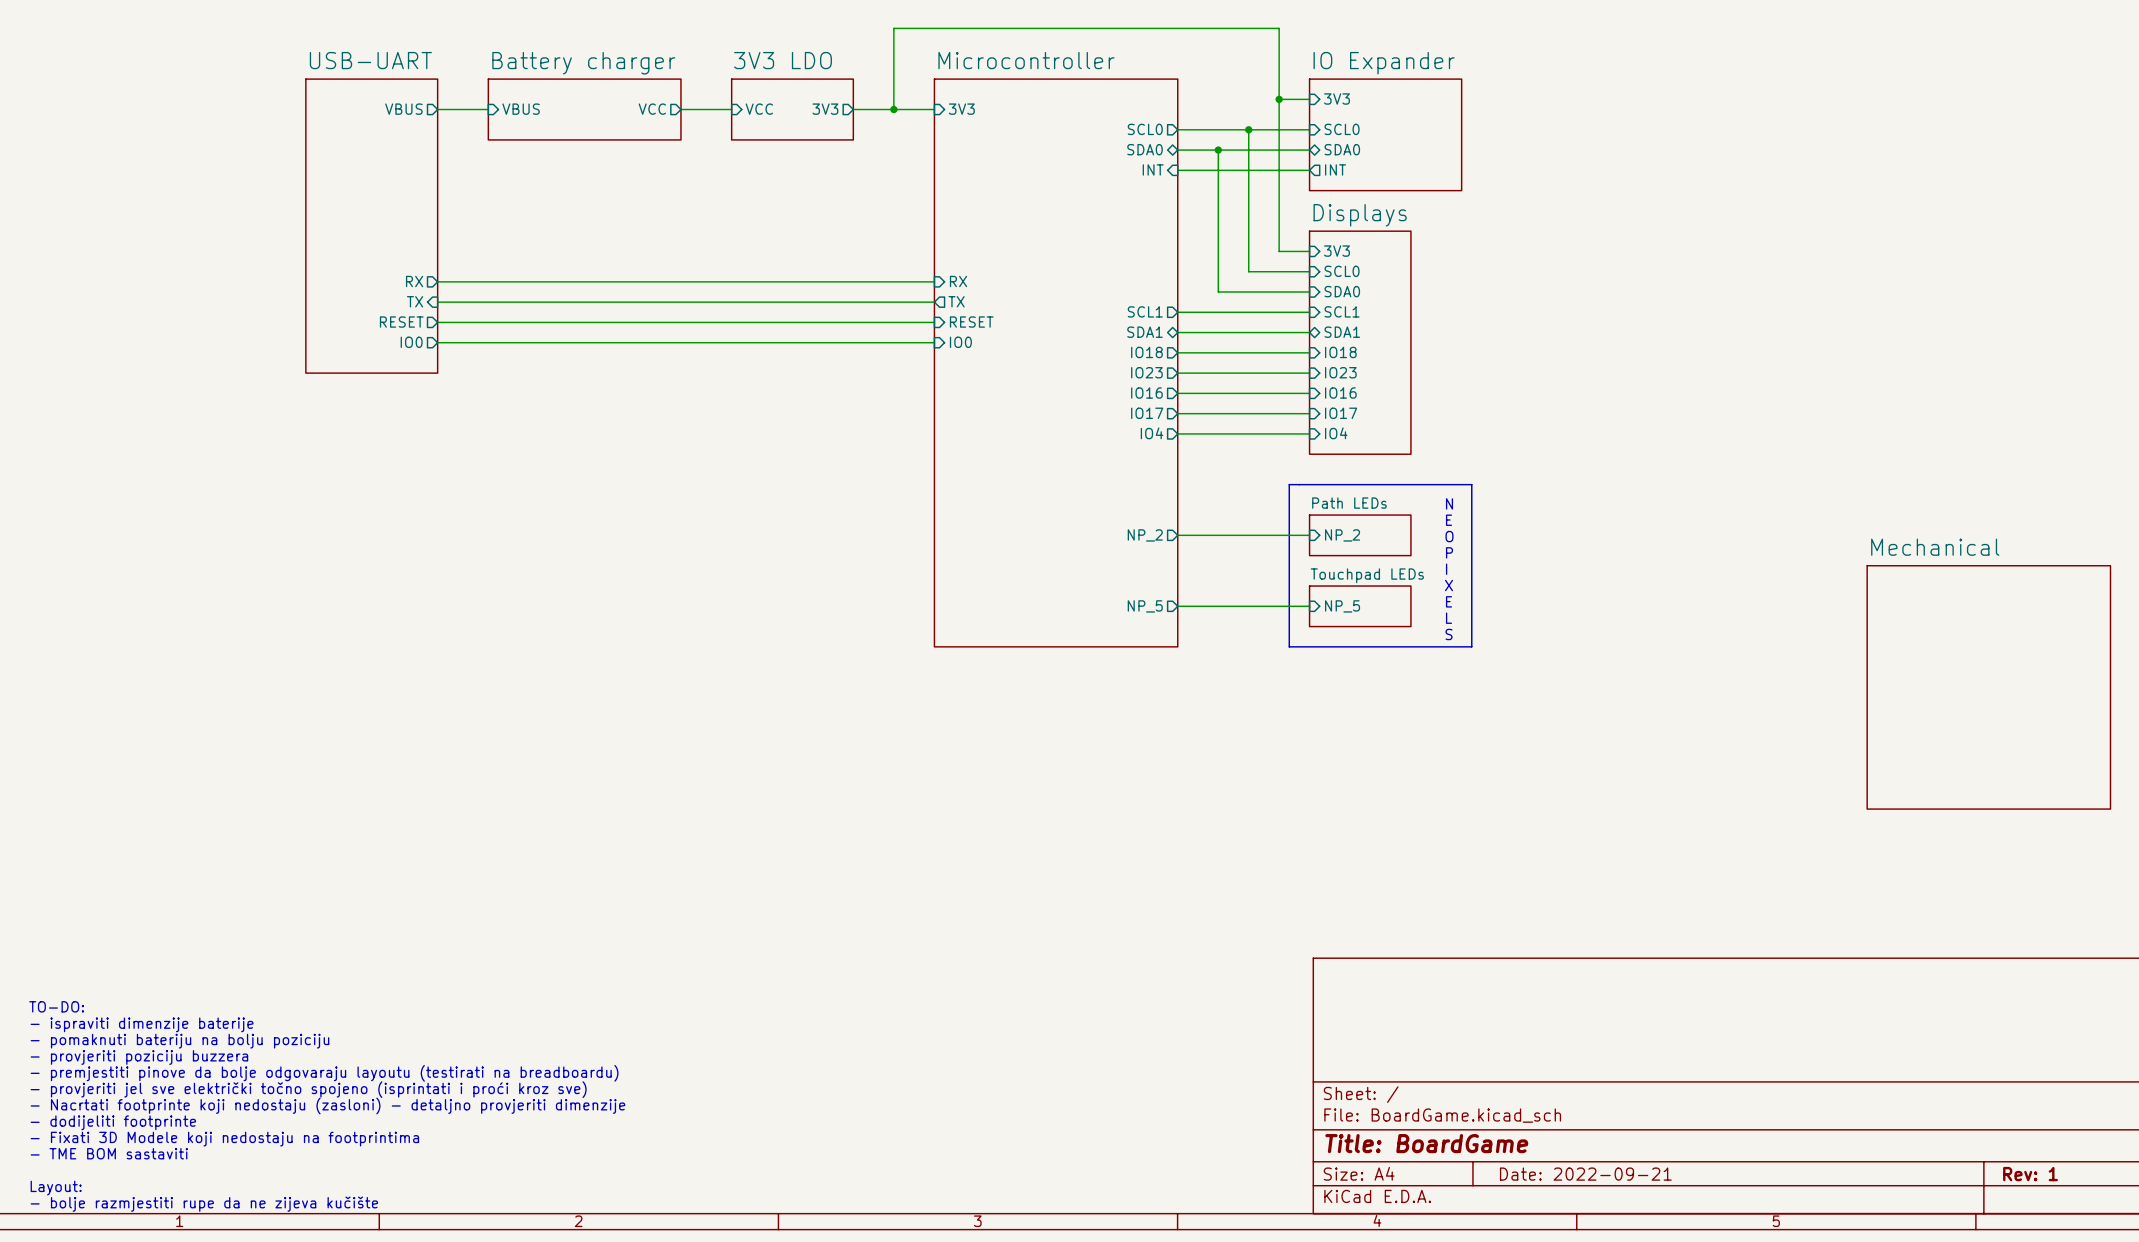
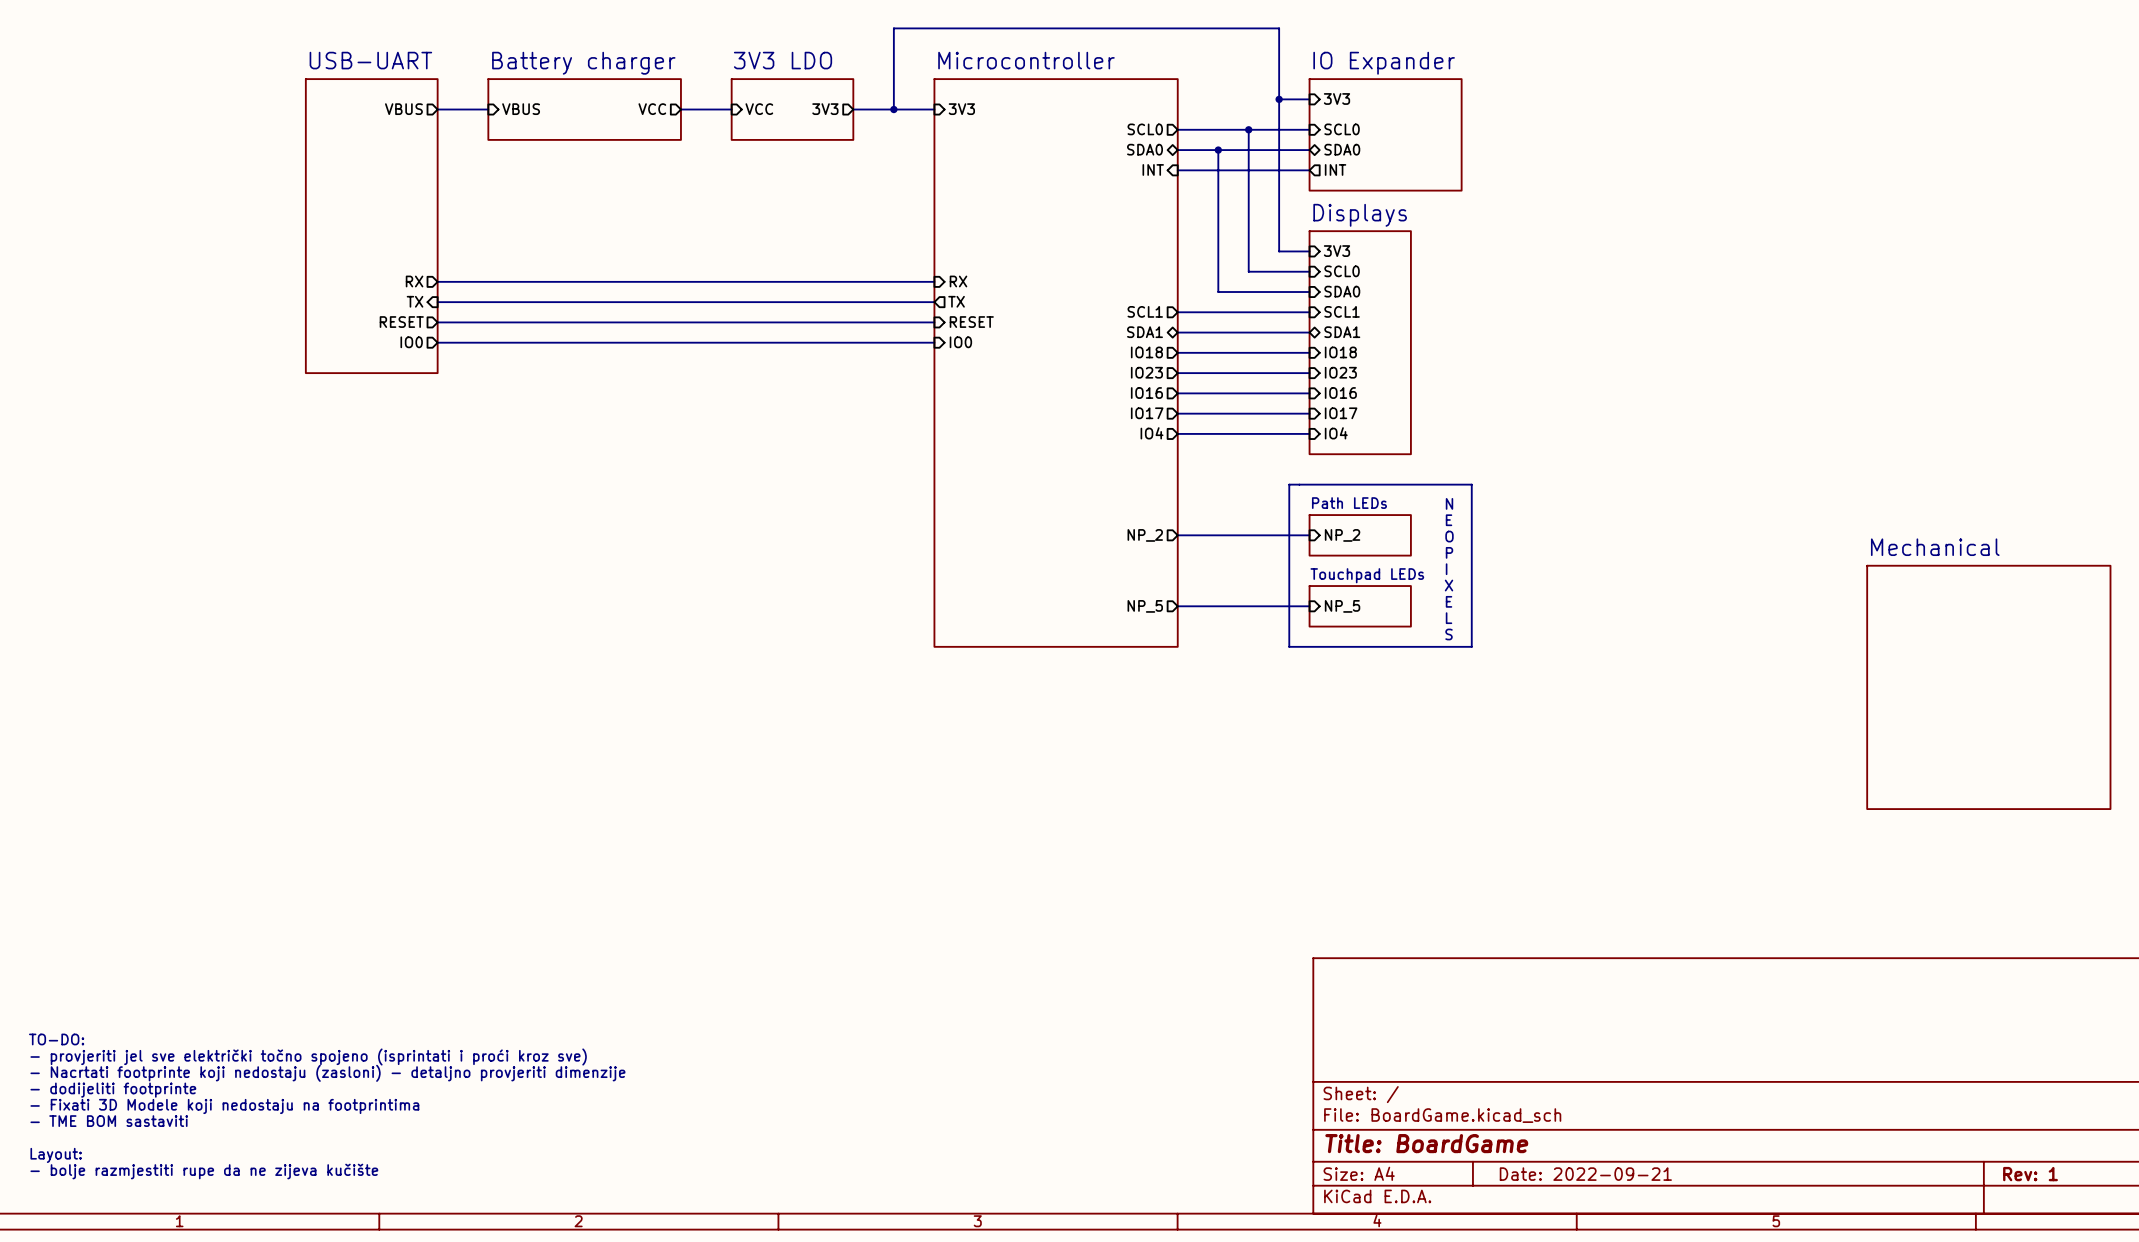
text: TO-DO: (56, 1006) -> none
text: - ispraviti dimenzije baterije (142, 1024) -> none
text: - pomaknuti bateriju na bolju poziciju (179, 1041) -> TO-DO: (56, 1039)
text: - provjeriti poziciju buzzera (139, 1057) -> - provjeriti jel sve električki točno spojeno (isprintati i proći kroz sve) (308, 1057)
text: - premjestiti pinove da bolje odgovaraju layoutu (testirati na breadboardu) (324, 1073) -> - Nacrtati footprinte koji nedostaju (zasloni) - detaljno provjeriti dimenzije (327, 1073)
text: - provjeriti jel sve električki točno spojeno (isprintati i proći kroz sve) (308, 1089) -> - dodijeliti footprinte (113, 1090)
text: - Nacrtati footprinte koji nedostaju (zasloni) - detaljno provjeriti dimenzije (327, 1105) -> - Fixati 3D Modele koji nedostaju na footprintima (224, 1106)
text: - dodijeliti footprinte (113, 1122) -> - TME BOM sastaviti (109, 1121)
text: - Fixati 3D Modele koji nedostaju na footprintima (224, 1139) -> none
text: - TME BOM sastaviti (109, 1153) -> Layout: (56, 1155)
text: Layout: (56, 1188) -> none
text position: - bolje razmjestiti rupe da ne zijeva kučište (204, 1204) -> - bolje razmjestiti rupe da ne zijeva kučište (204, 1171)

